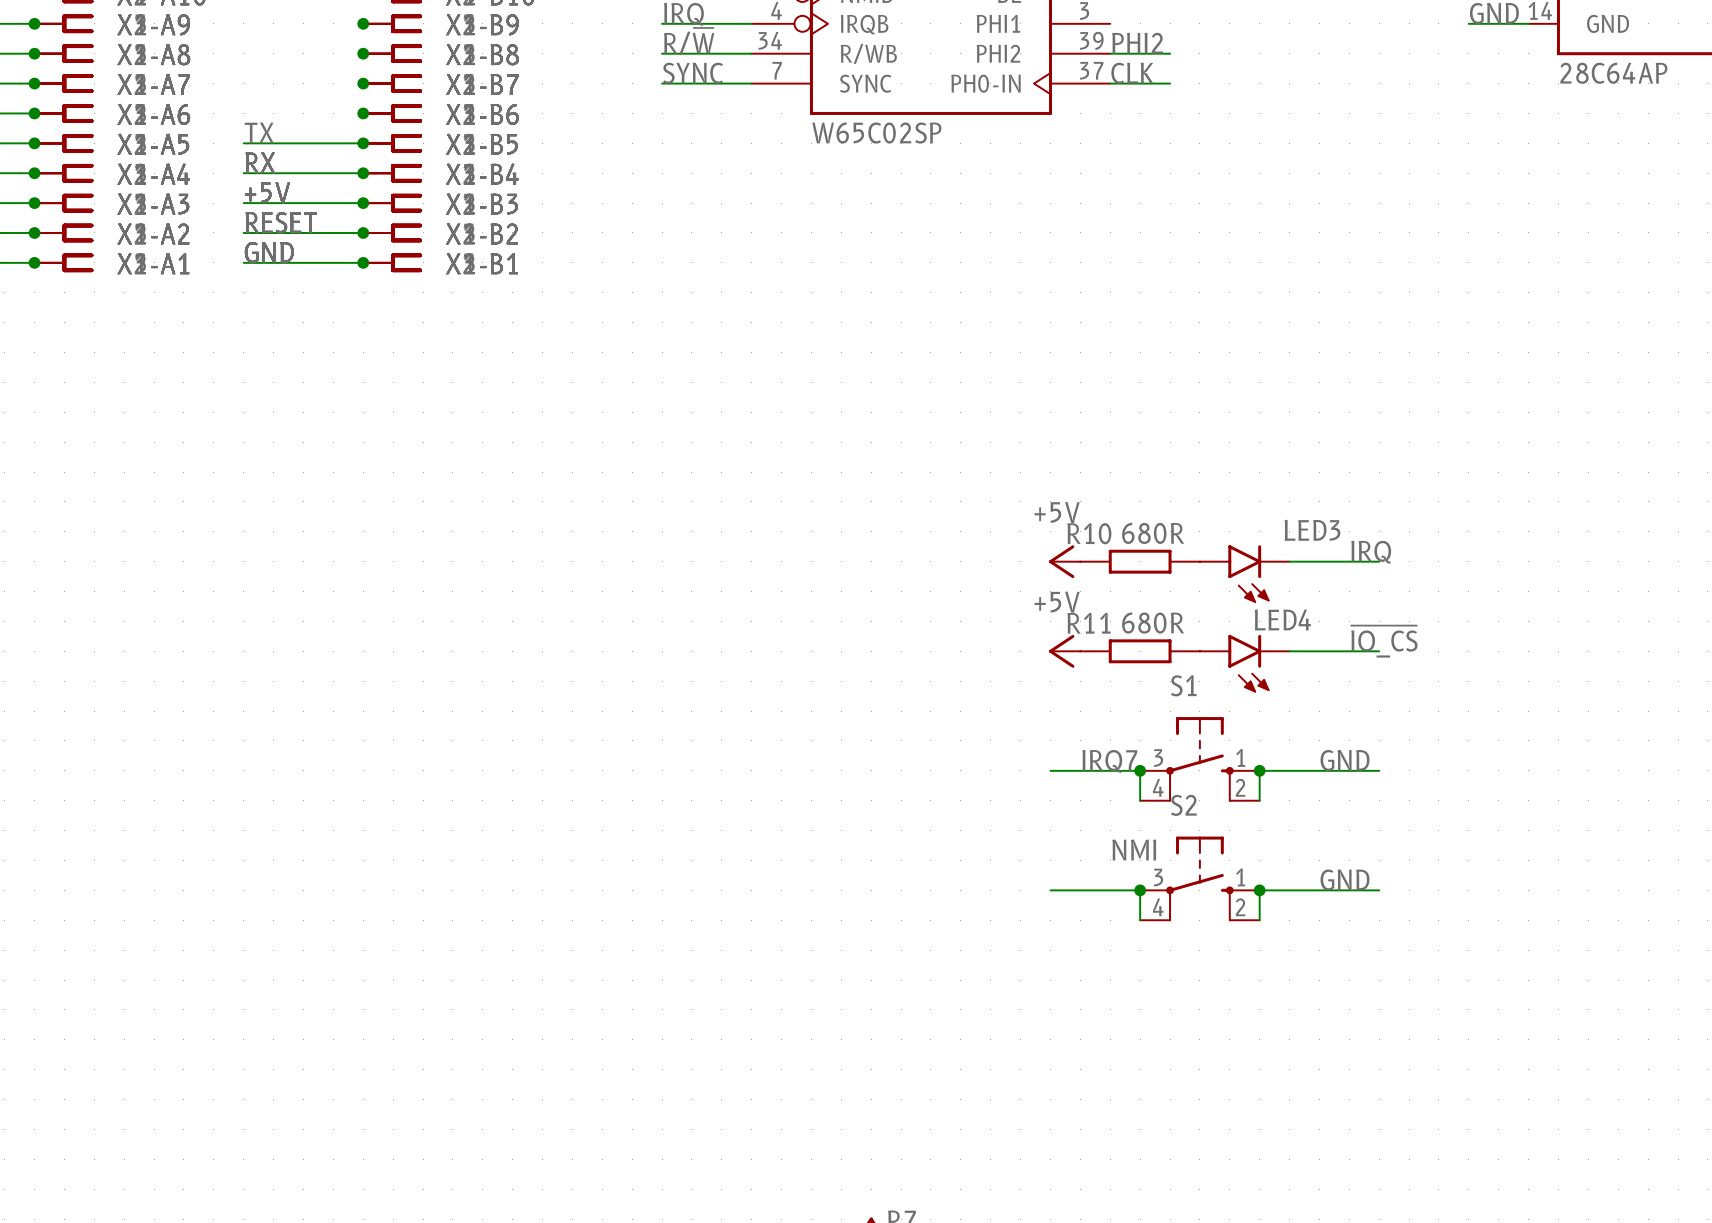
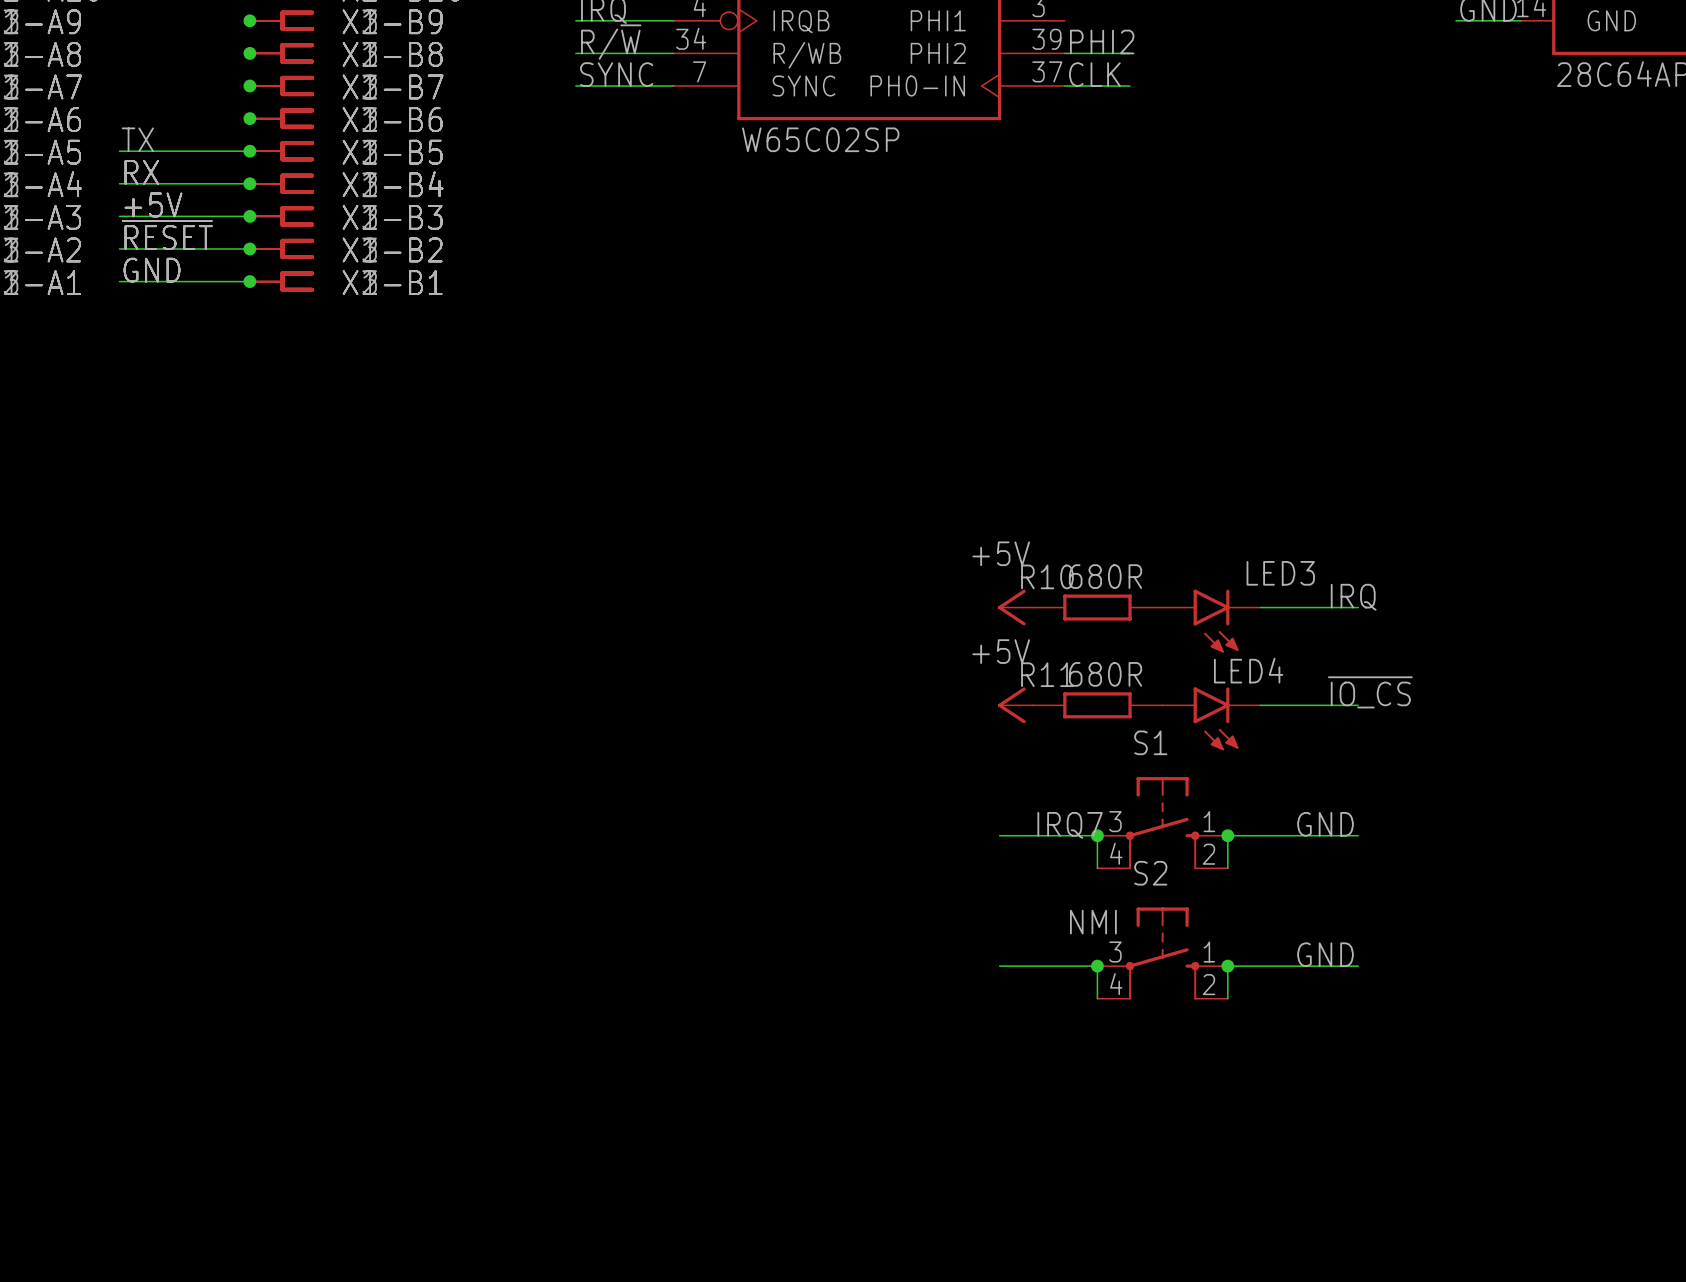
label: RESET (281, 222) -> ~{RESET} (167, 234)

